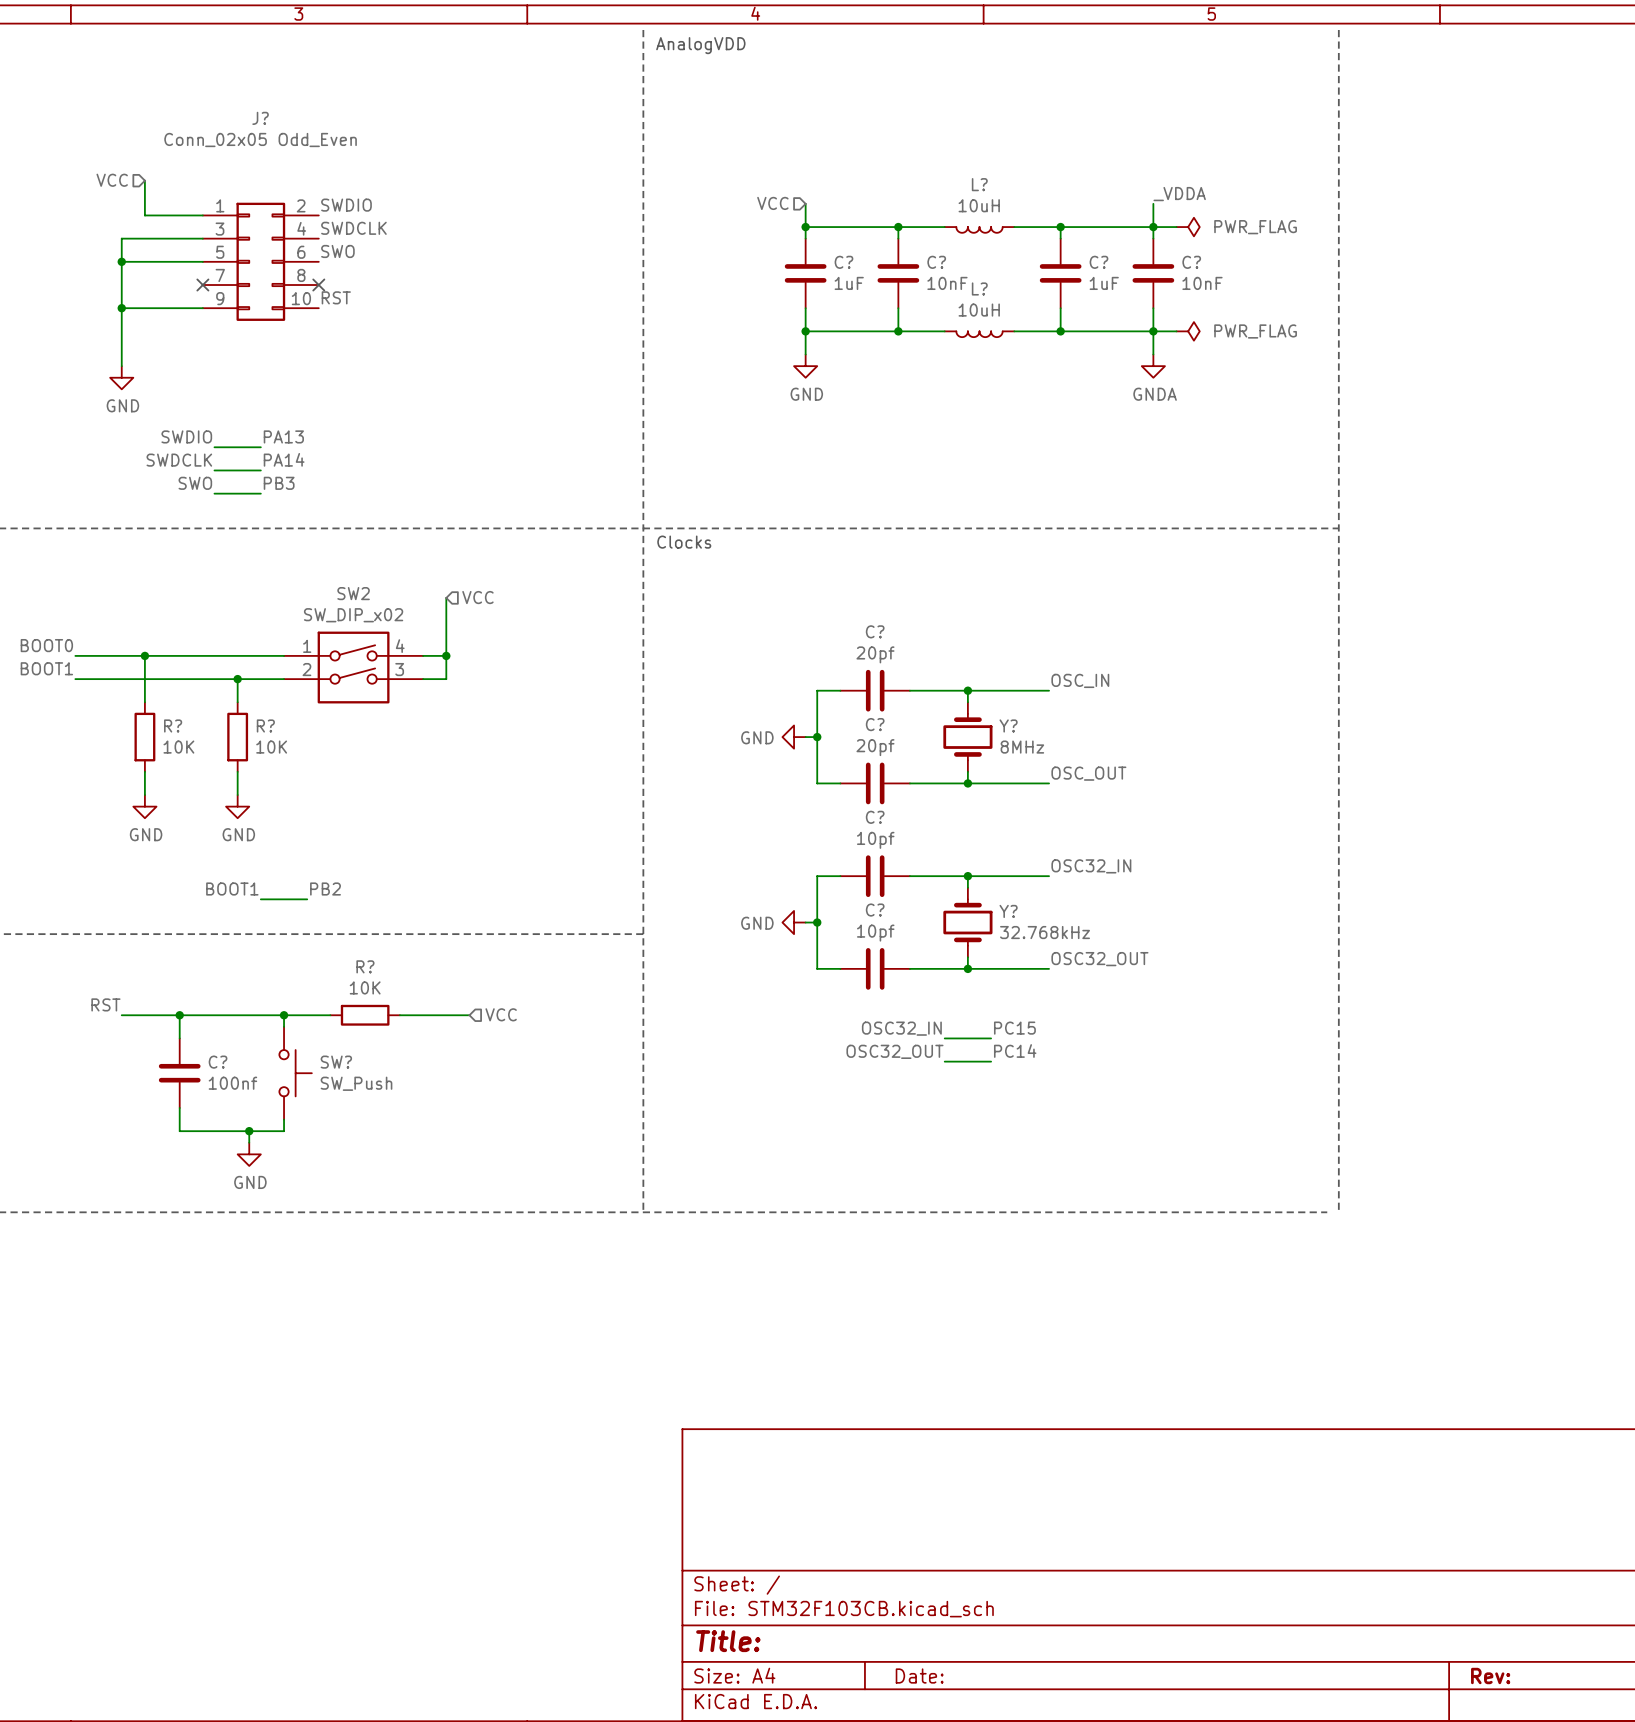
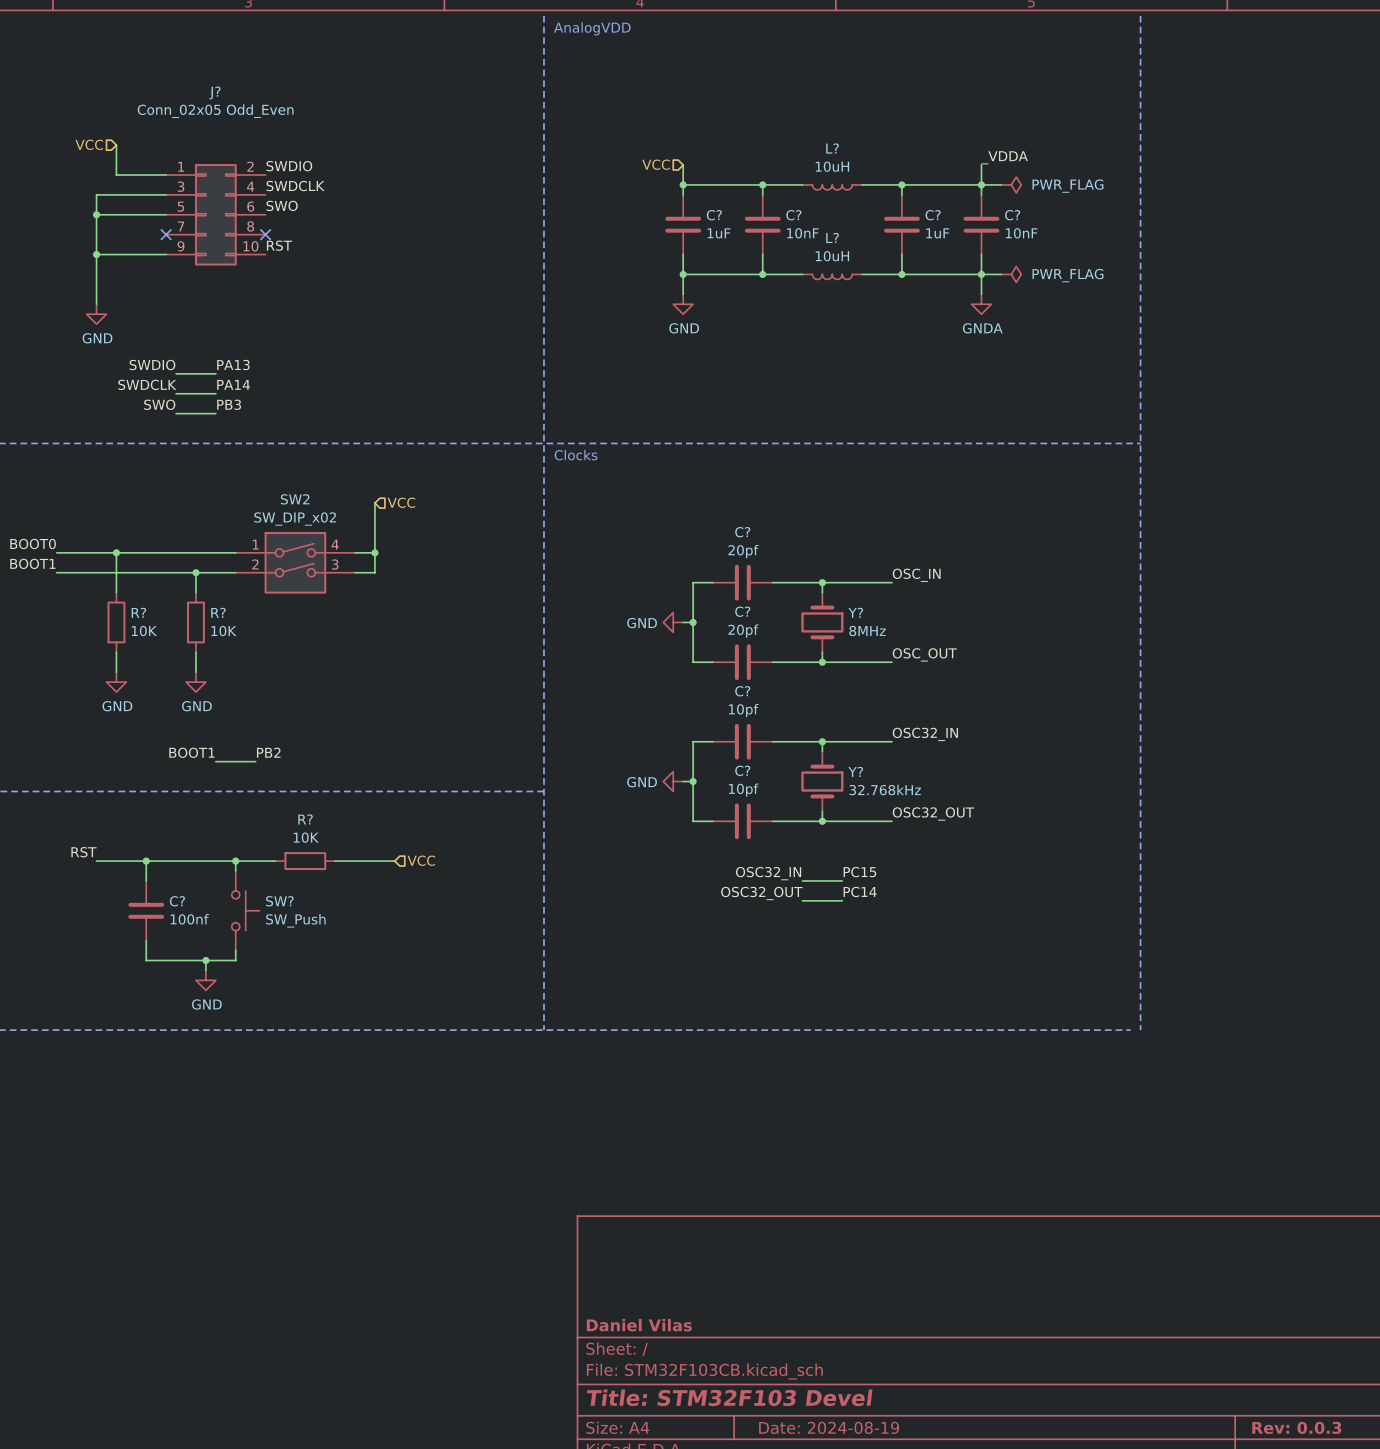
title block: none -> Daniel Vilas (639, 1325)
title block: Title: (728, 1641) -> Title: STM32F103 Devel (729, 1397)
title block: Date: (919, 1676) -> Date: 2024-08-19 (829, 1427)
title block: Rev: (1490, 1676) -> Rev: 0.0.3 (1296, 1427)

